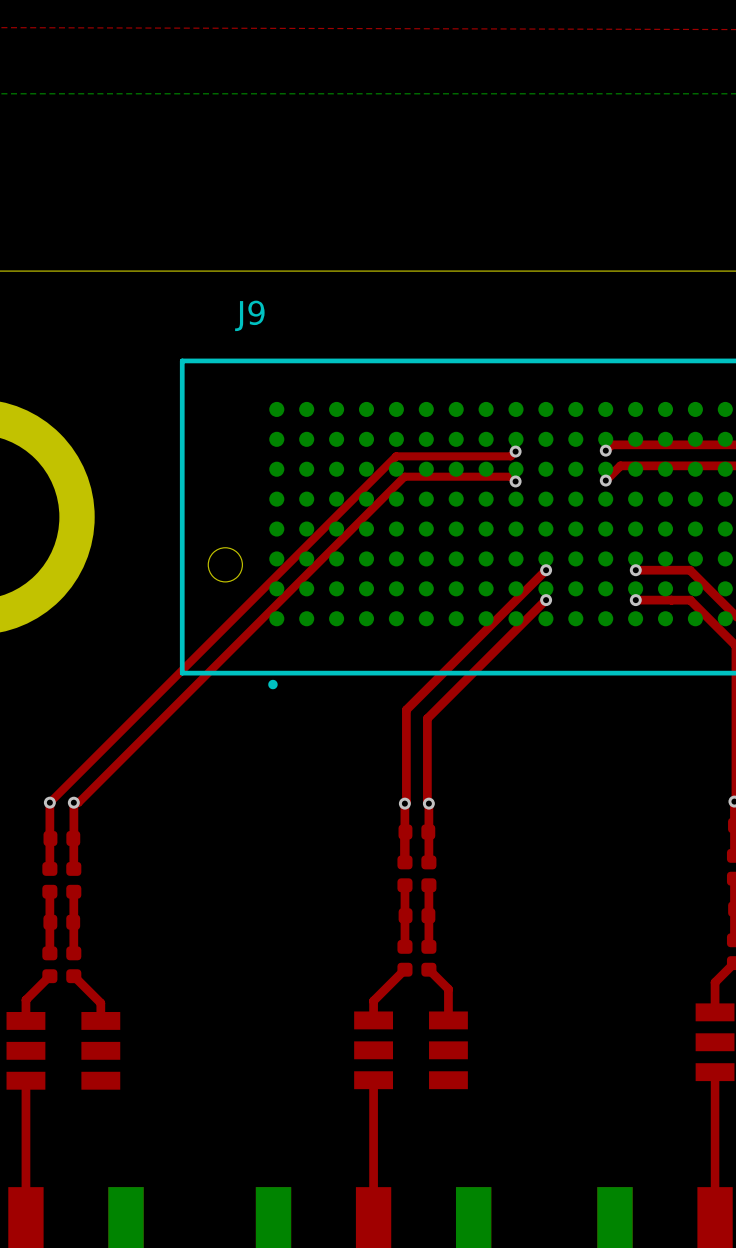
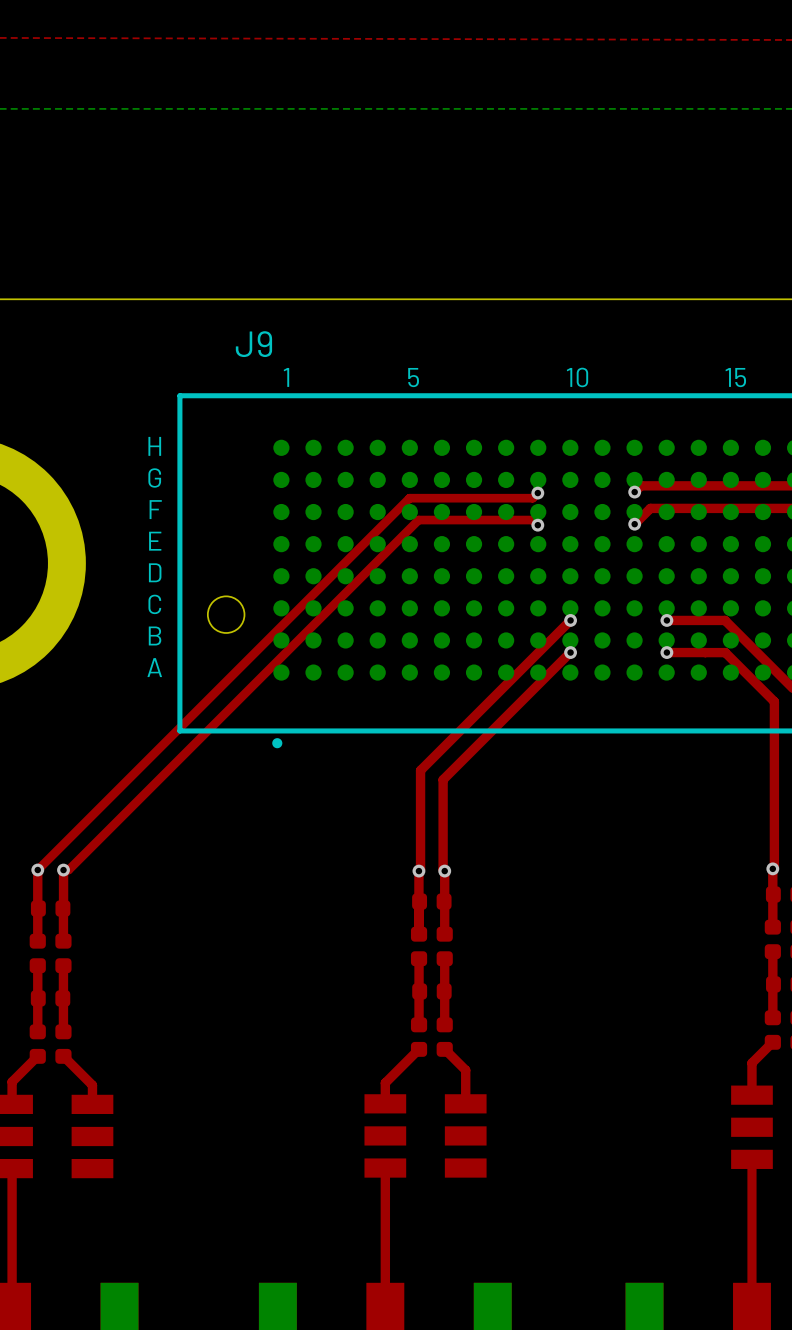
text: none -> 1 (286, 377)
text: none -> 10 (577, 377)
text: none -> 5 (413, 377)
text: none -> 15 (735, 377)
text: none -> H (154, 446)
text: none -> G (154, 477)
text: none -> F (155, 509)
text: none -> E (155, 541)
text: none -> D (155, 572)
text: none -> C (154, 604)
text: none -> B (155, 635)
text: none -> A (154, 667)

